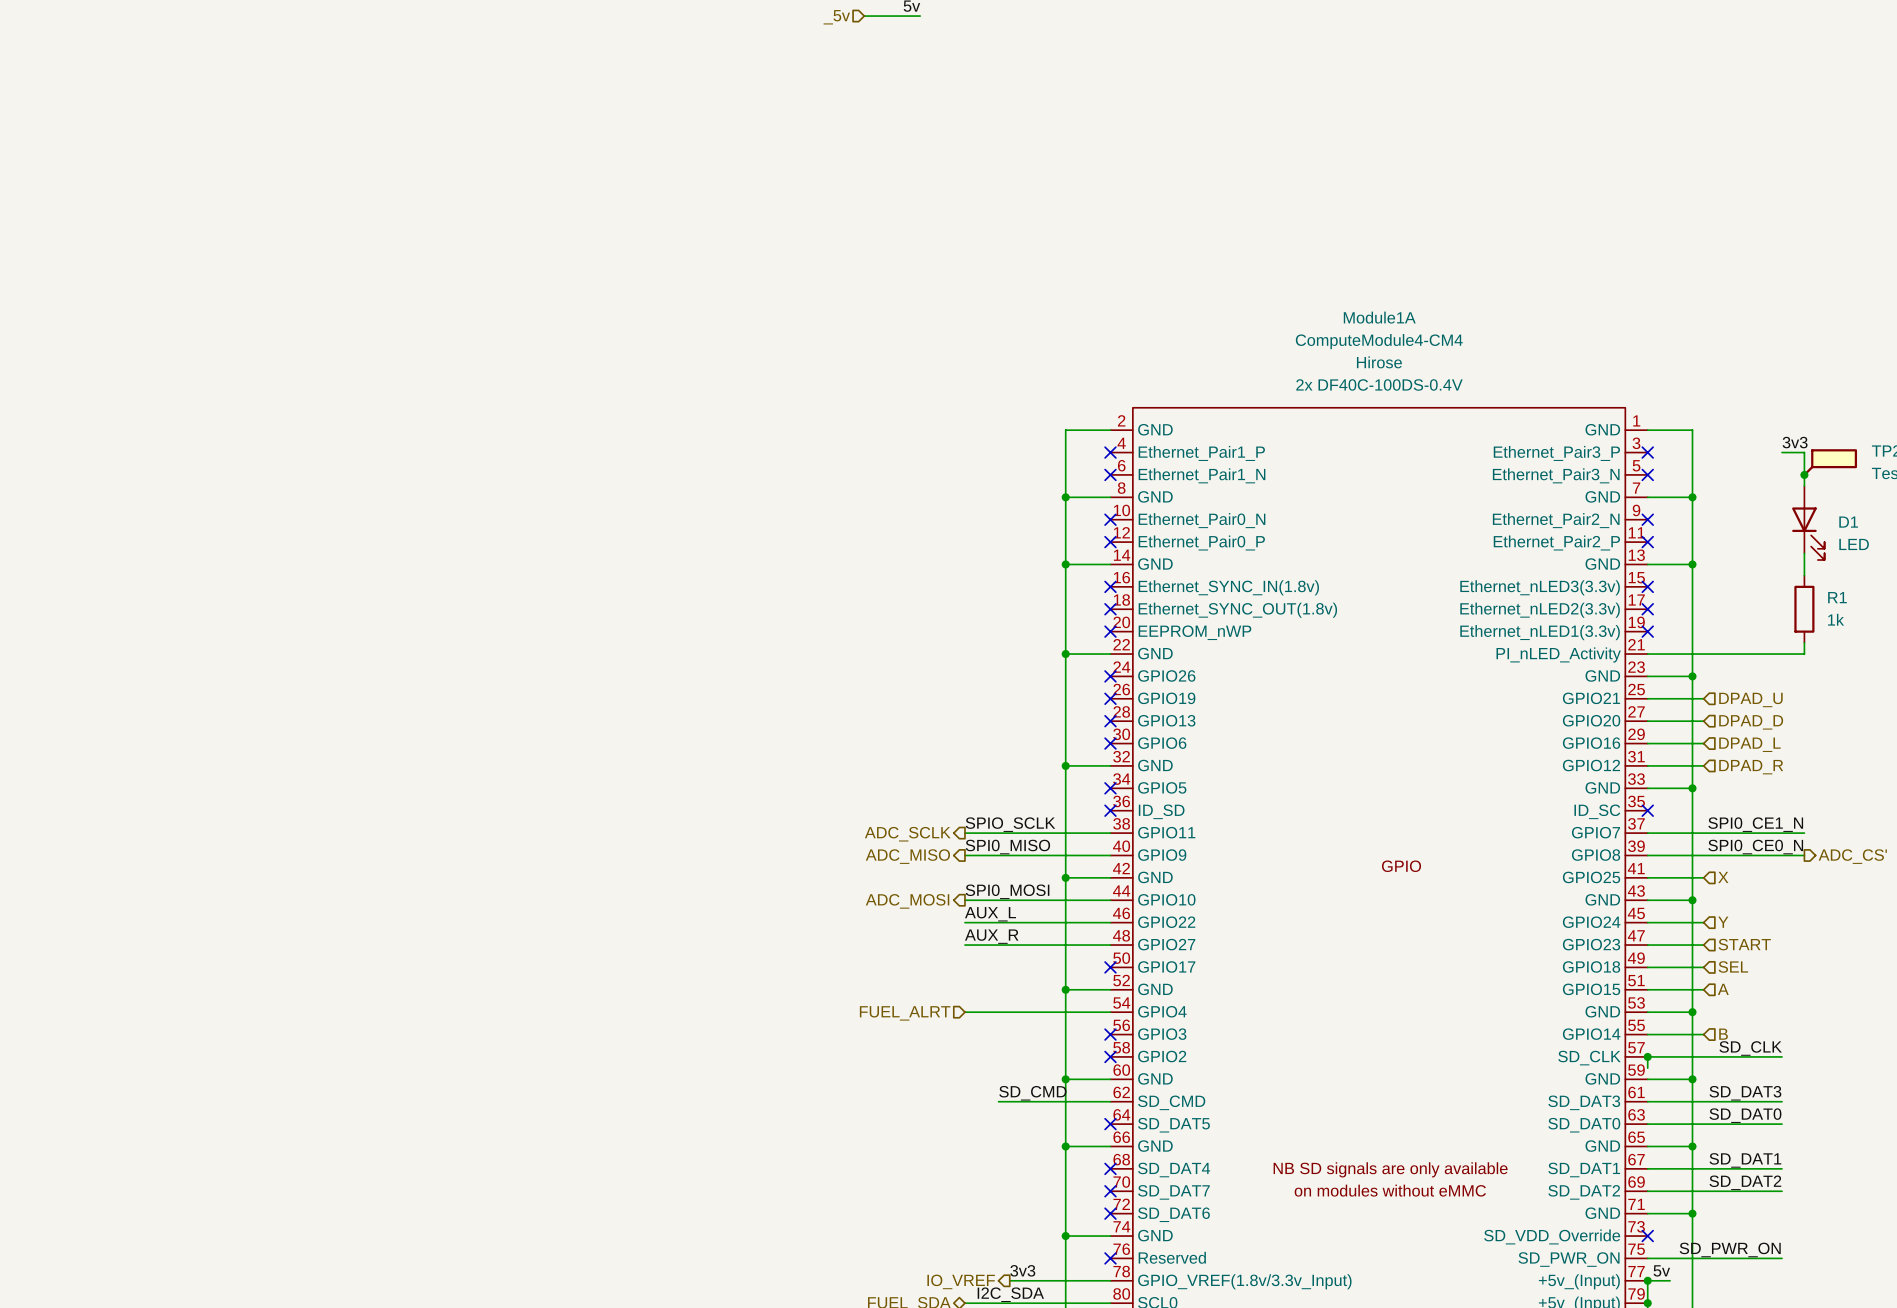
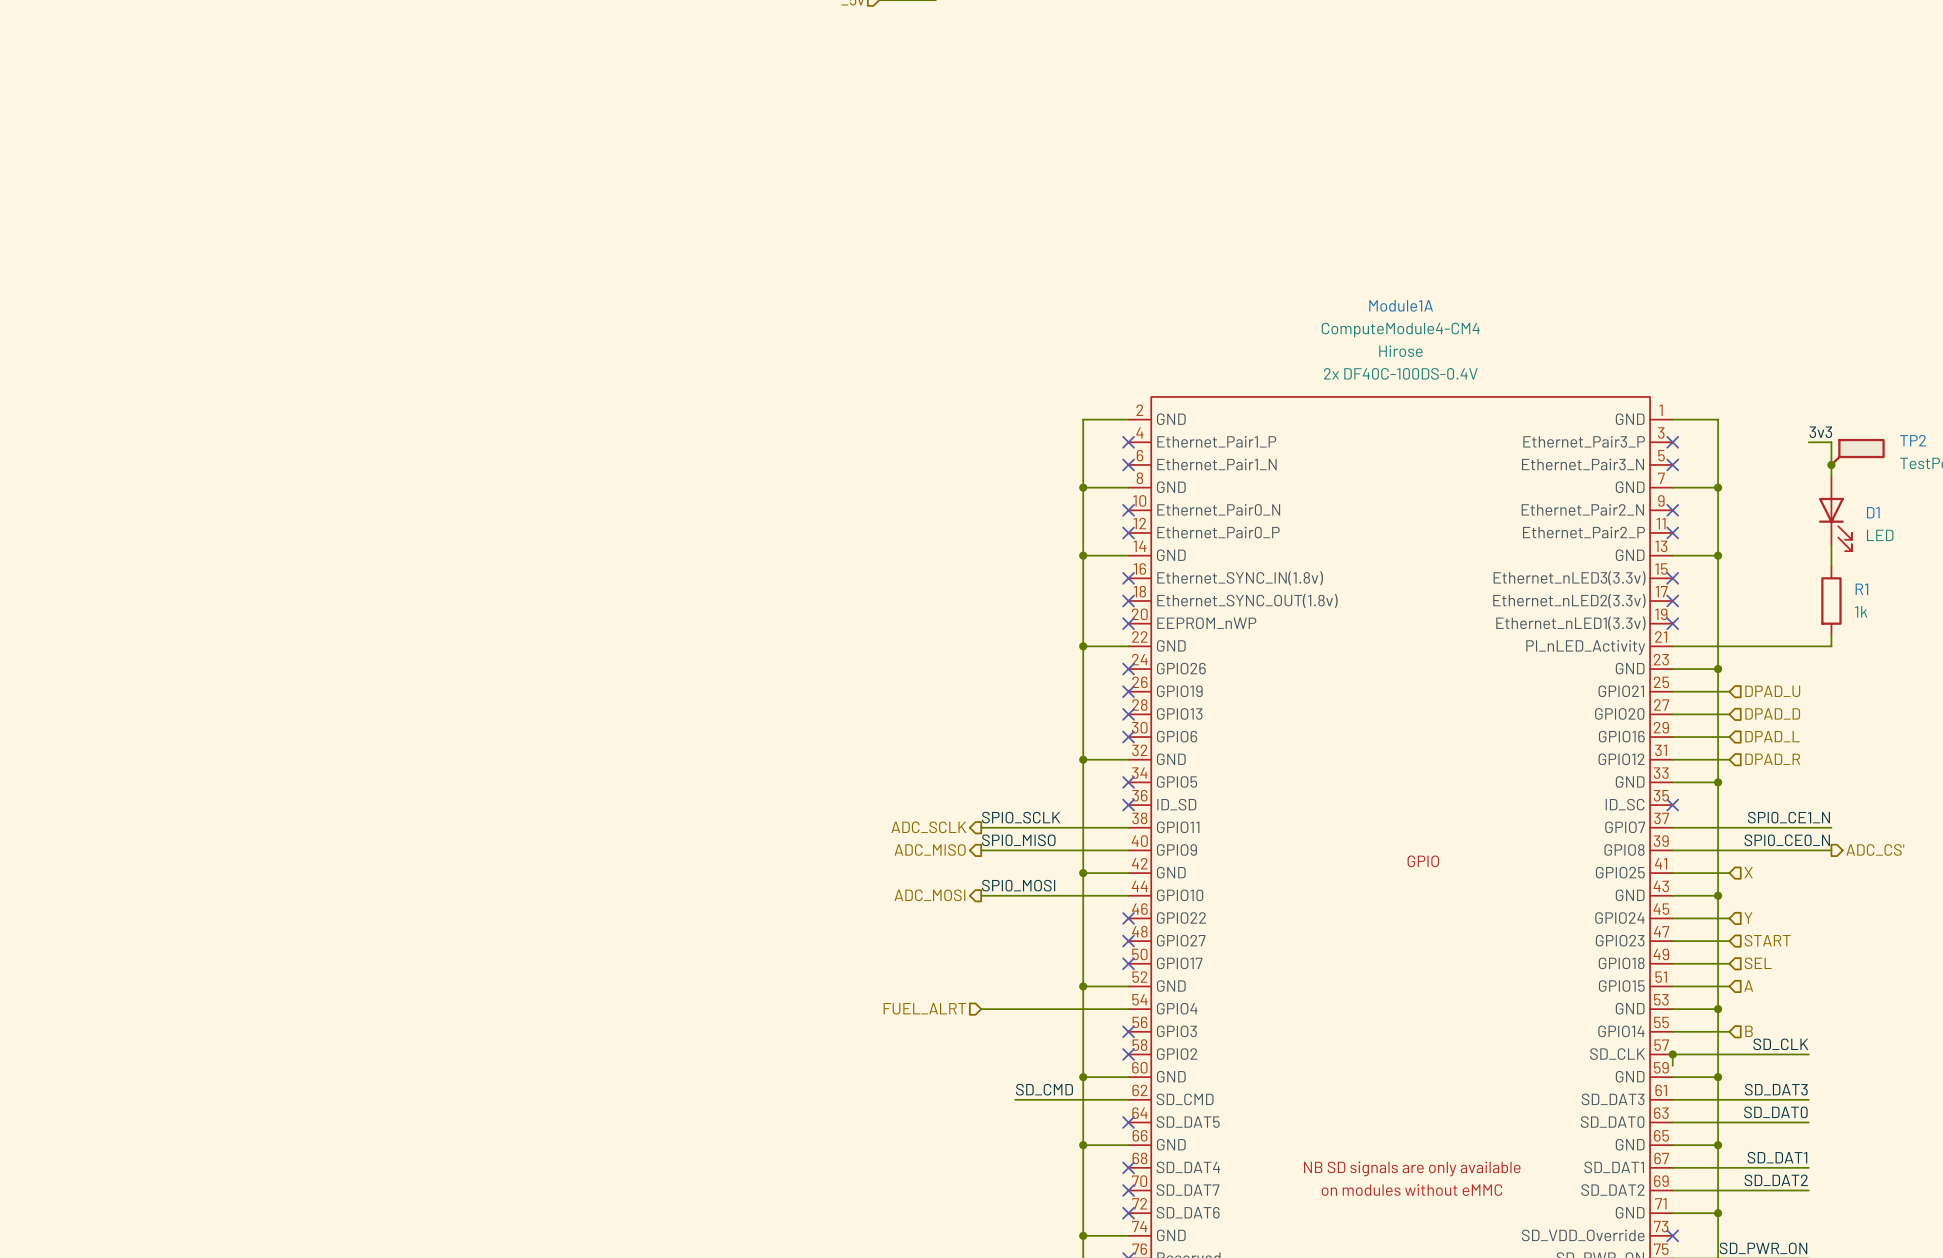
label: AUX_L (990, 914) -> none
wire: (964, 922) (1110, 922) -> none
no-connect mark: none -> (1128, 918)
label: AUX_R (991, 936) -> none
wire: (964, 945) (1110, 945) -> none
no-connect mark: none -> (1128, 941)

